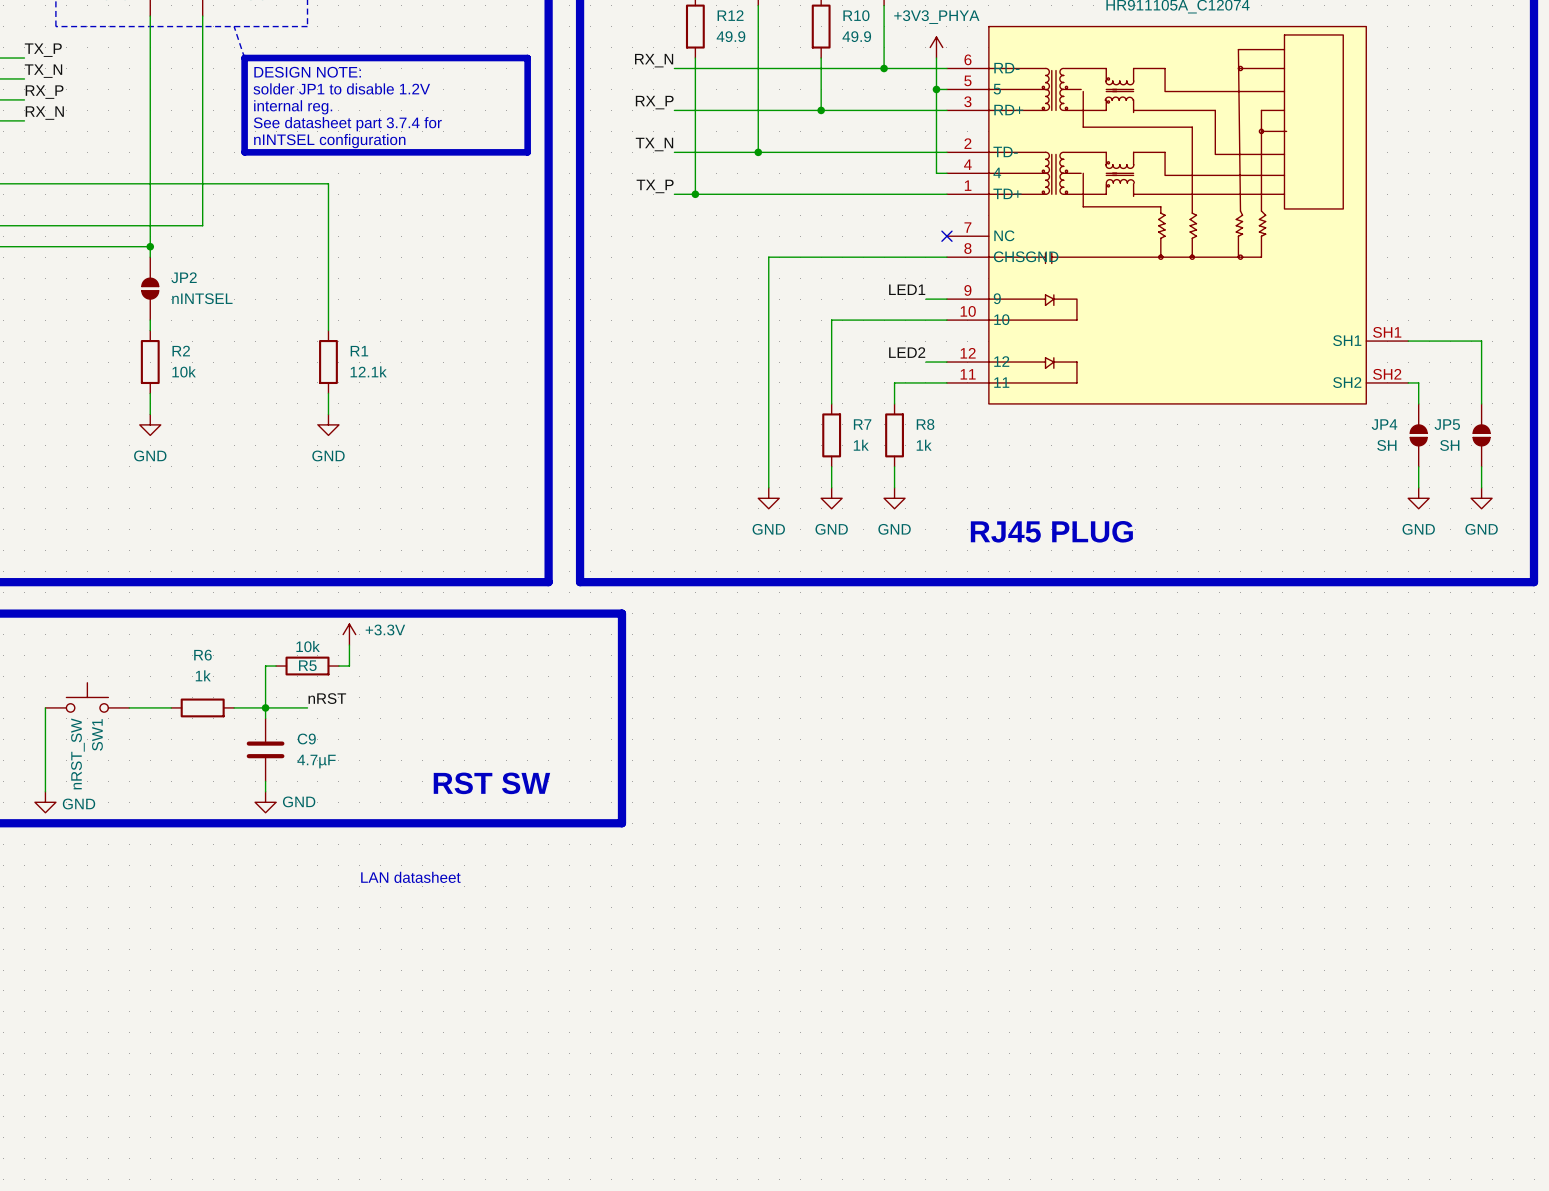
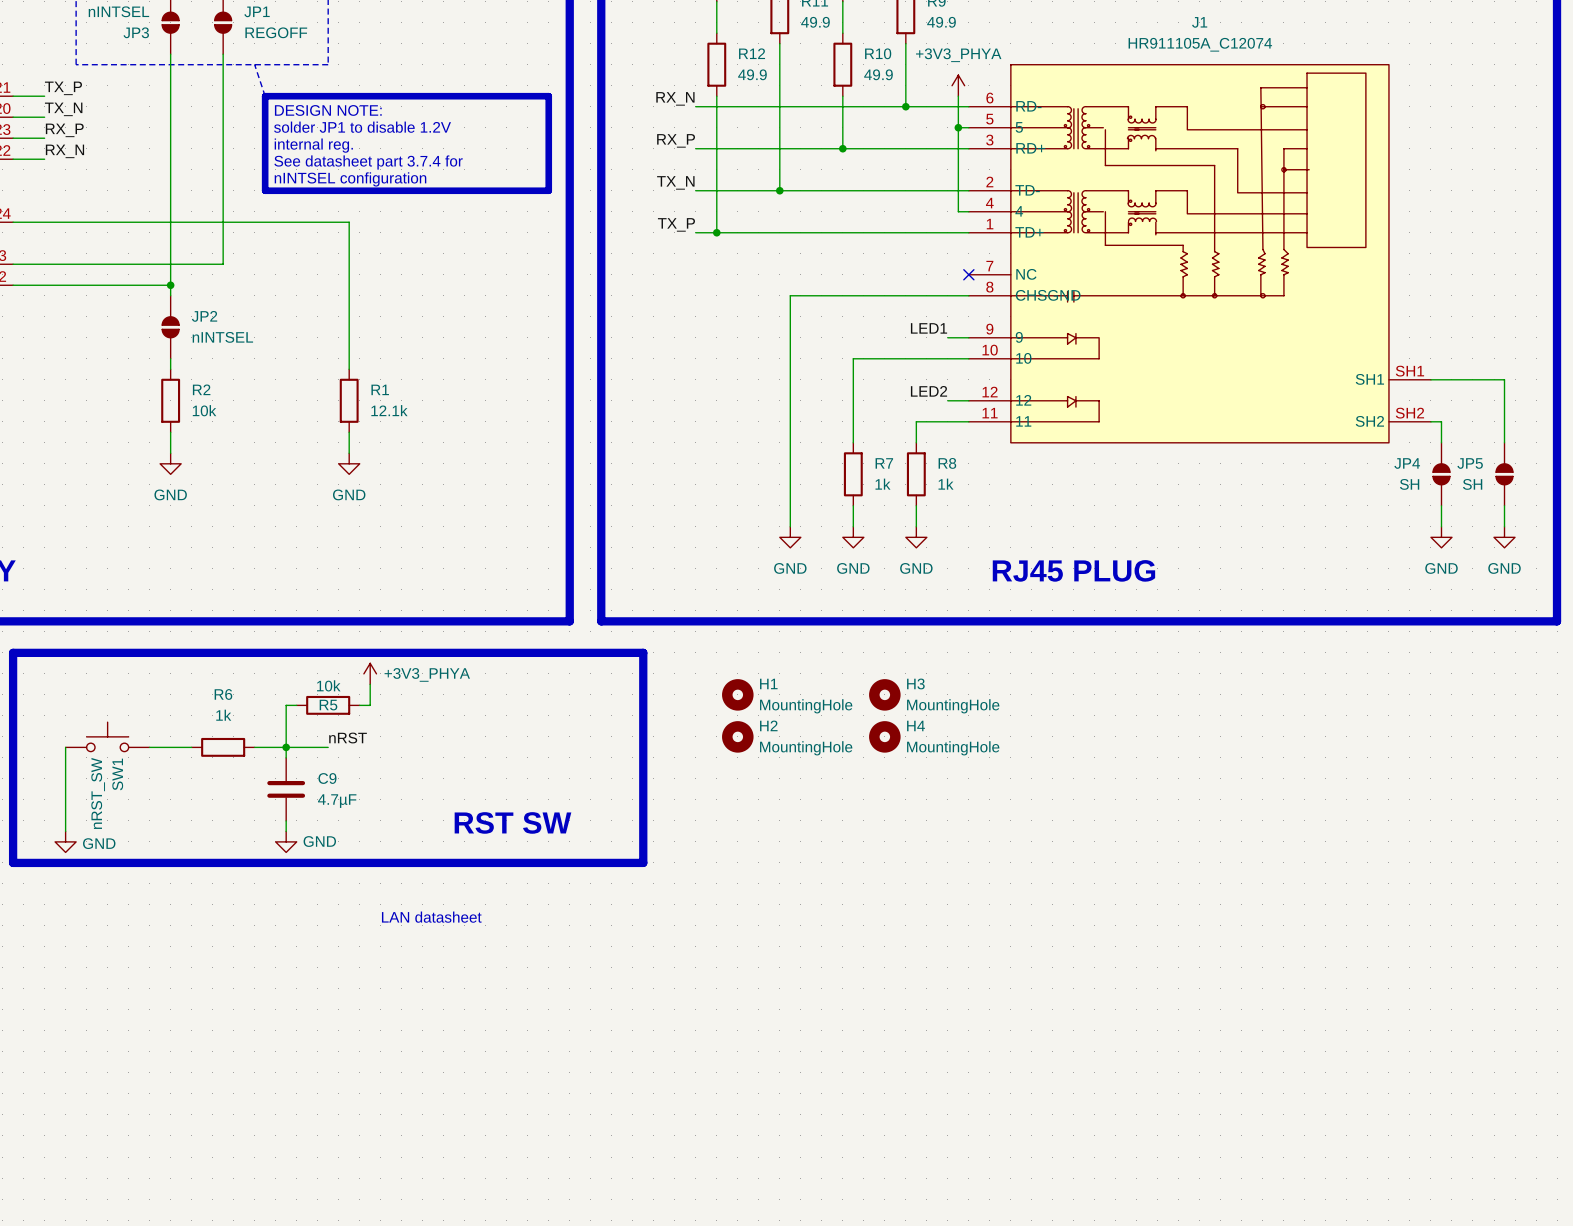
power symbol: +3.3V (349, 634) -> +3V3_PHYA (370, 673)
H1: none -> MountingHole (737, 694)
H3: none -> MountingHole (884, 694)
H2: none -> MountingHole (737, 736)
H4: none -> MountingHole (884, 736)

